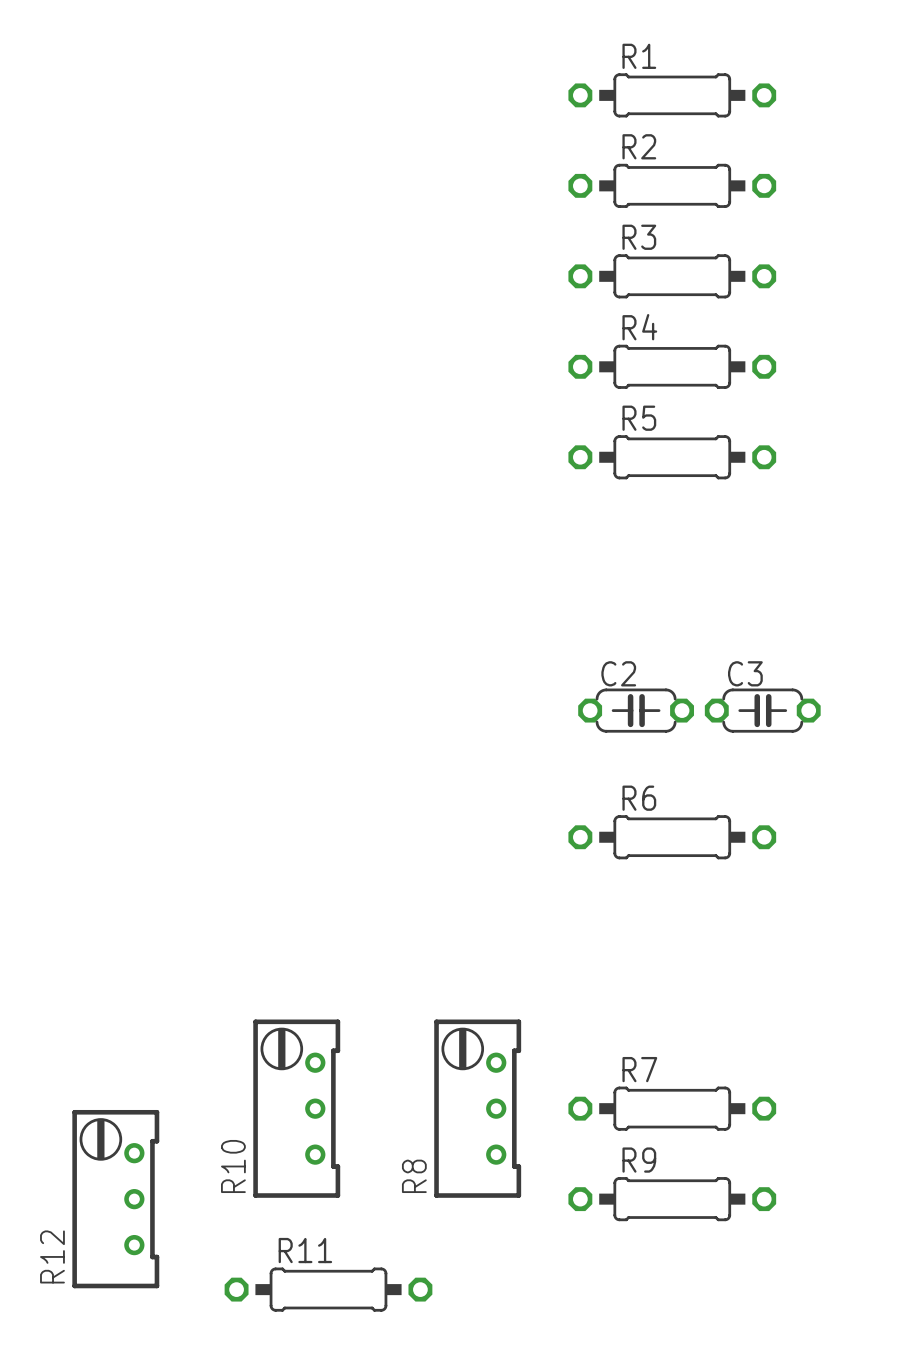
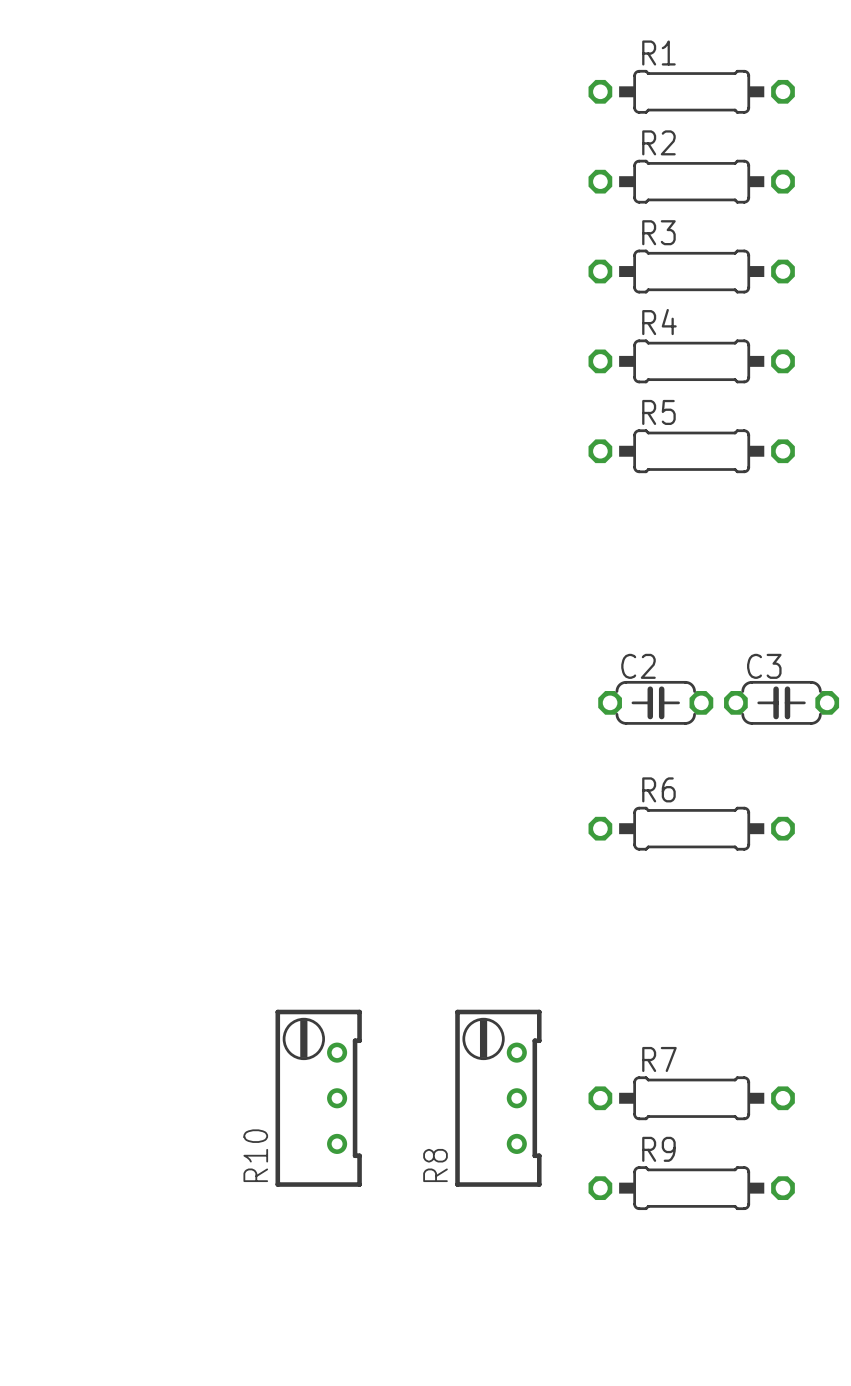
R12: (115, 1199) -> none
R11: (328, 1289) -> none

